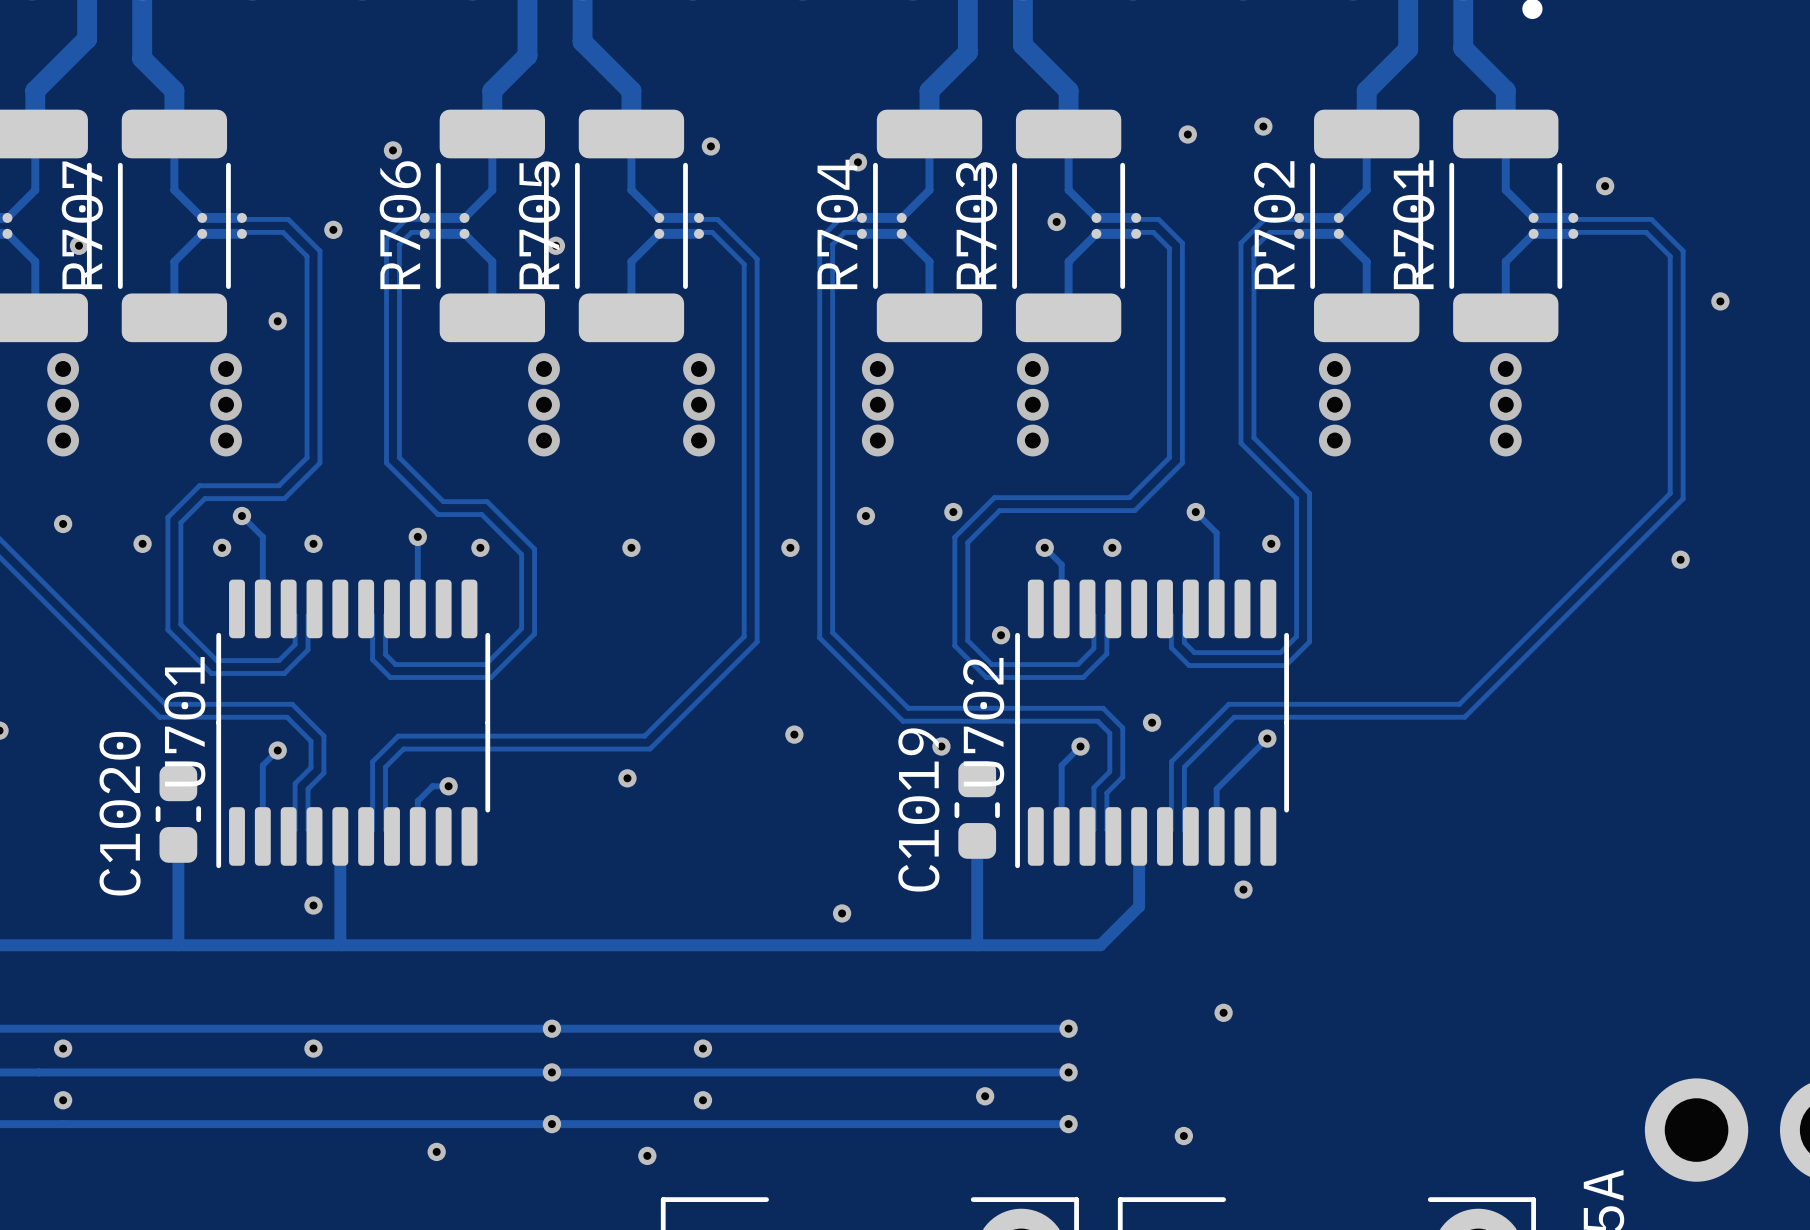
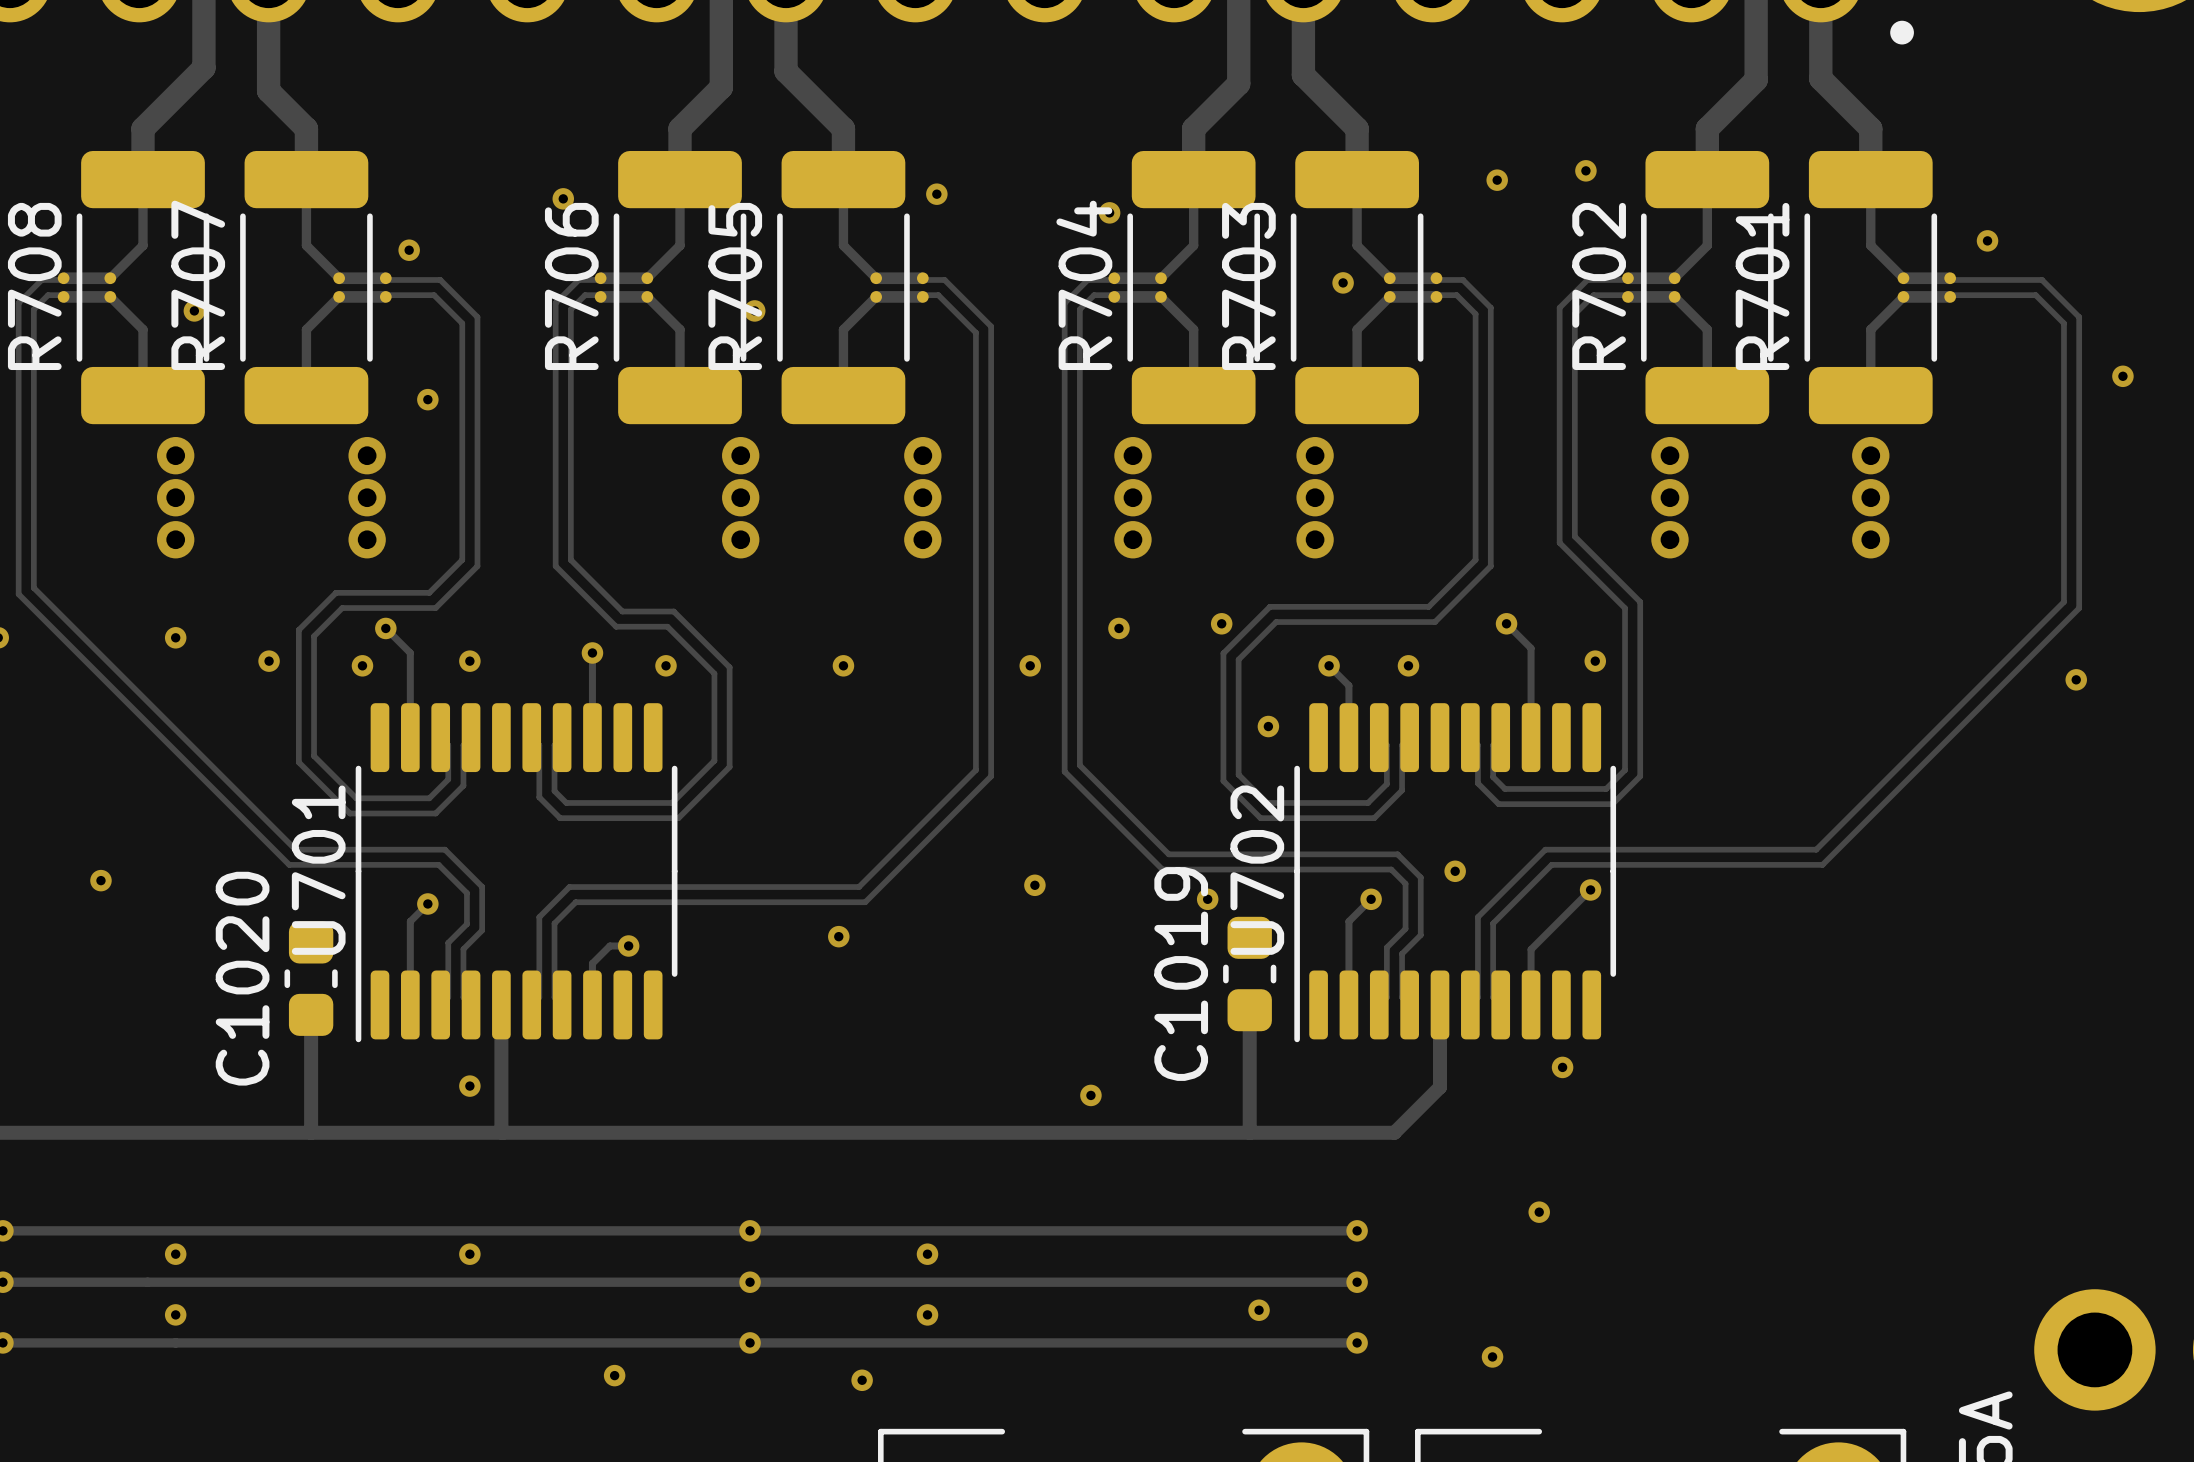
via position: (333, 229) -> (409, 250)
via position: (1001, 635) -> (1268, 726)

